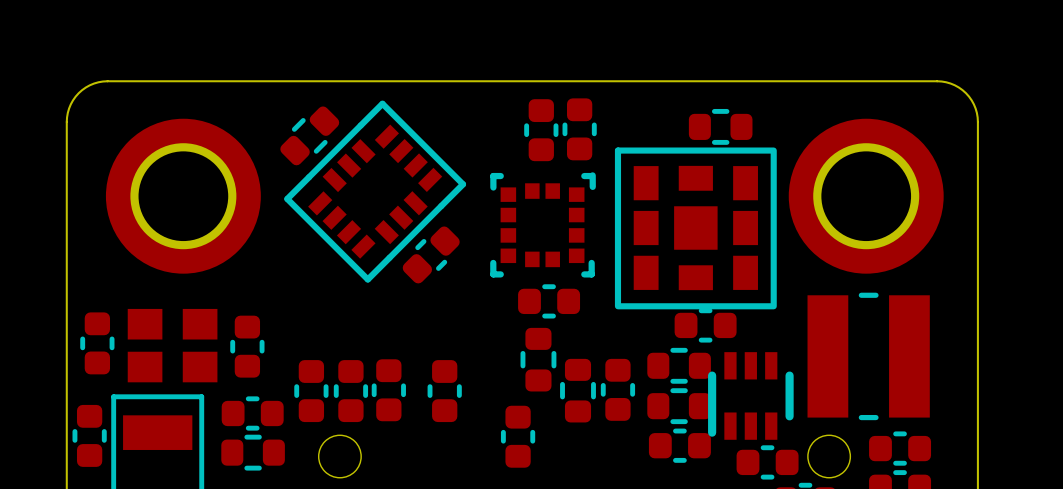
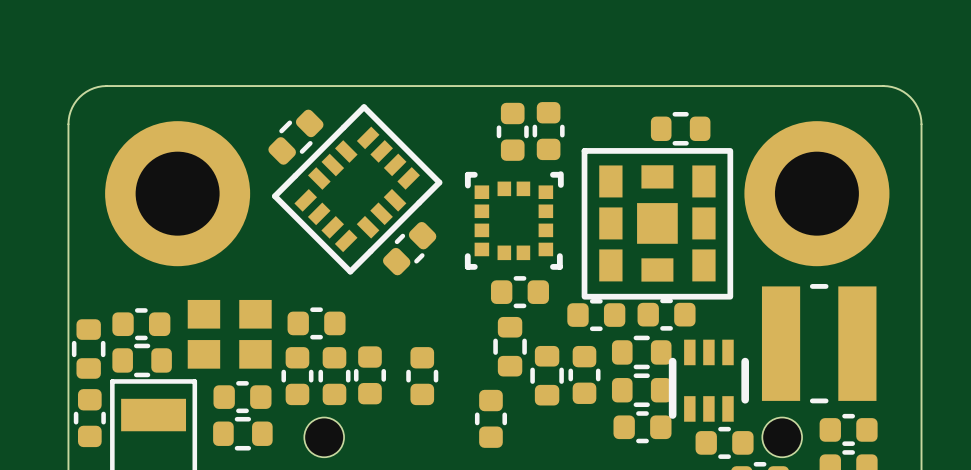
part footprint: [80, 312, 115, 375] -> [71, 319, 106, 379]
part footprint: [230, 315, 265, 378] -> [187, 299, 272, 369]
part: none -> (596, 315)
part: none -> (316, 323)
part: none -> (141, 324)
part: (172, 345) -> none
part: none -> (142, 360)

